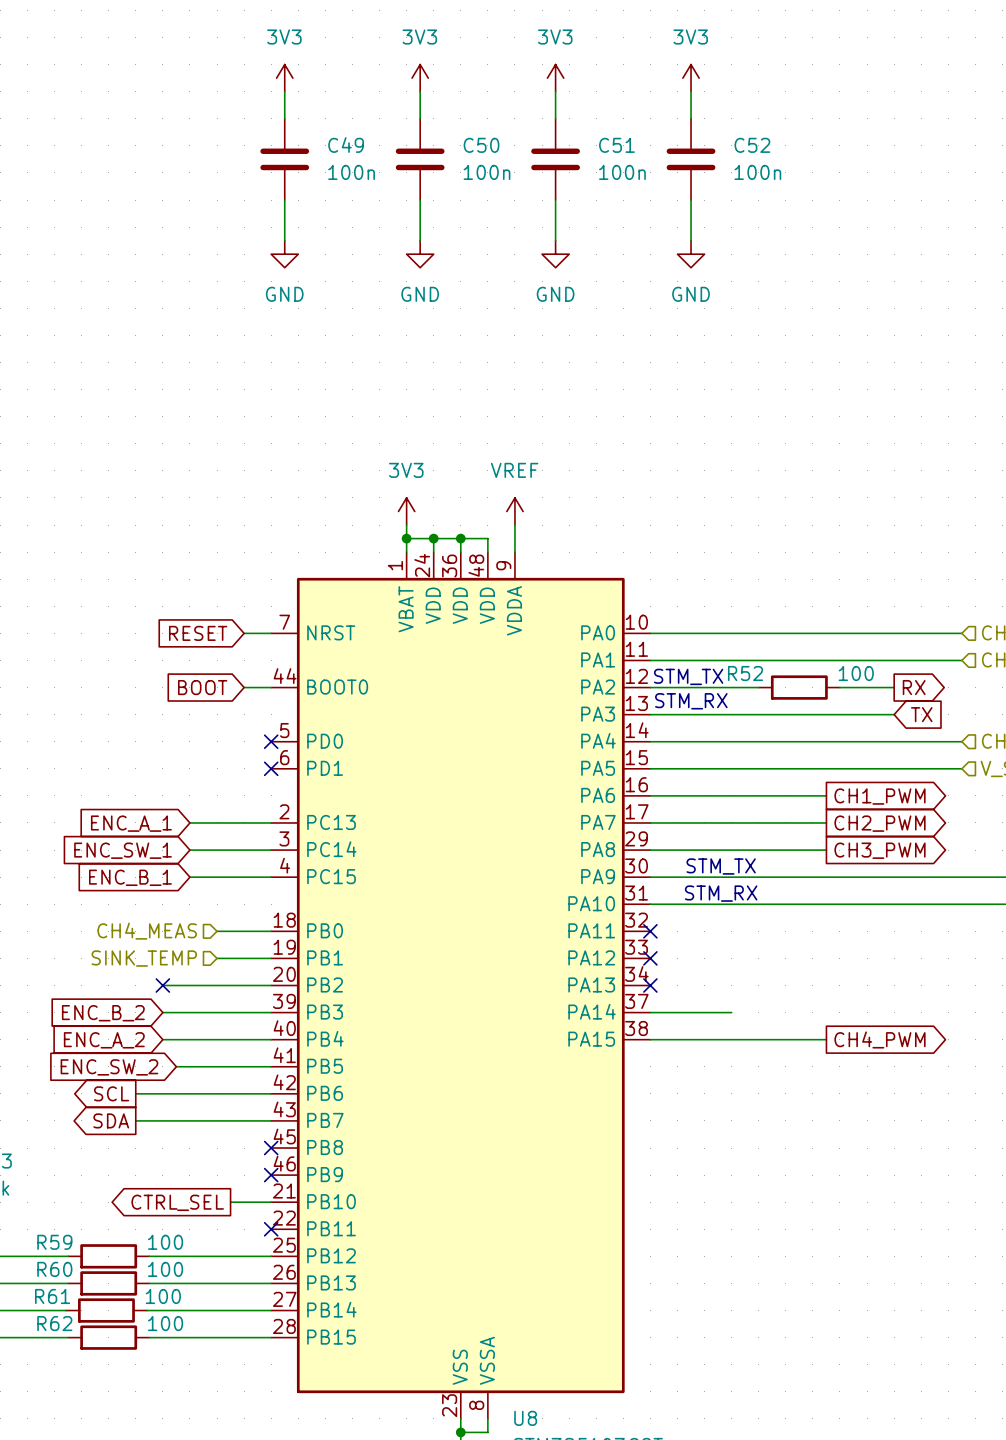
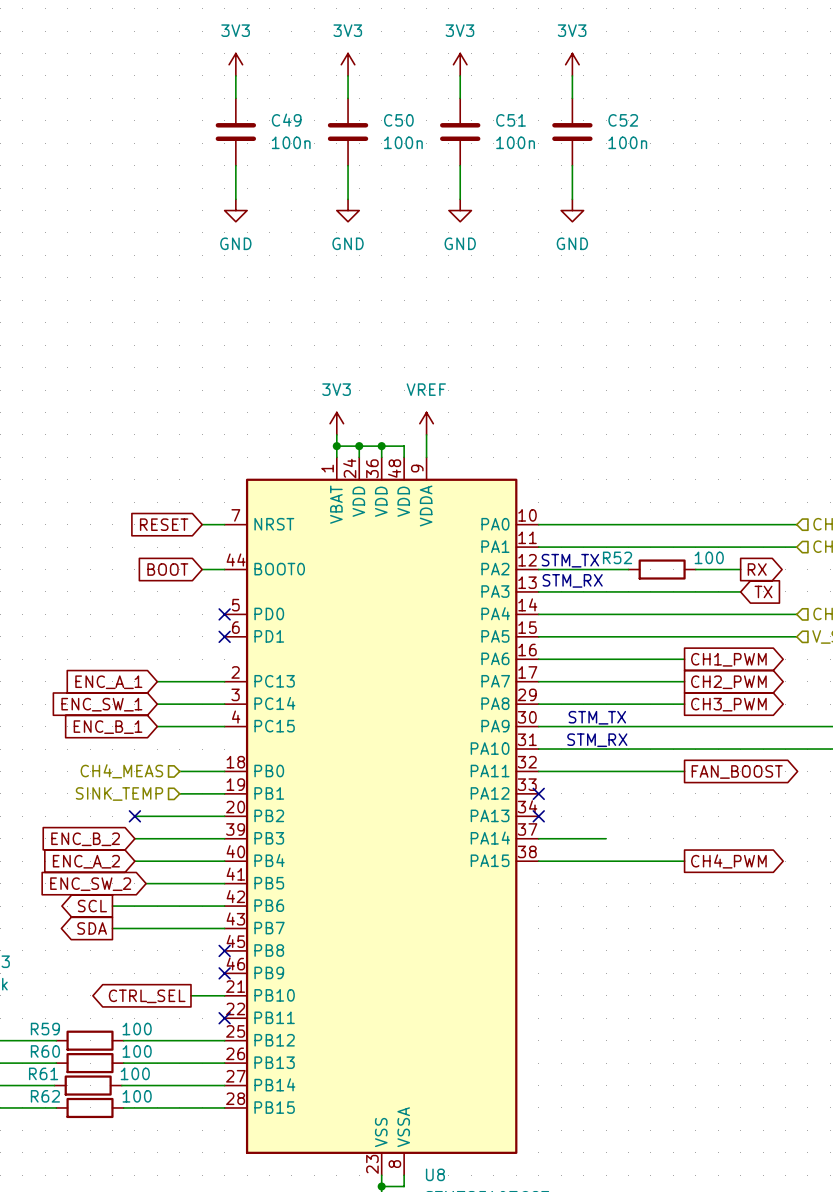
wire: none -> (538, 771) (684, 771)
no-connect mark: (650, 931) -> none
global label: none -> FAN_BOOST (737, 771)

